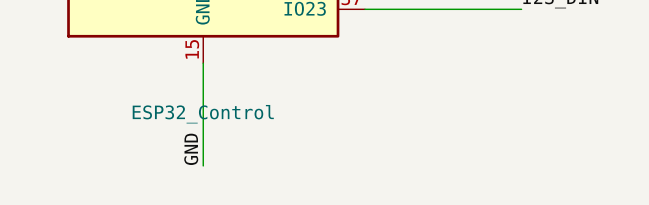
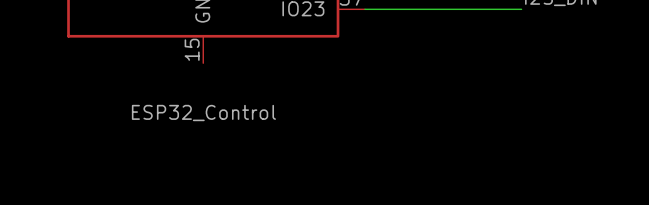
wire: (203, 63) (203, 165) -> none
label: GND (191, 149) -> none

